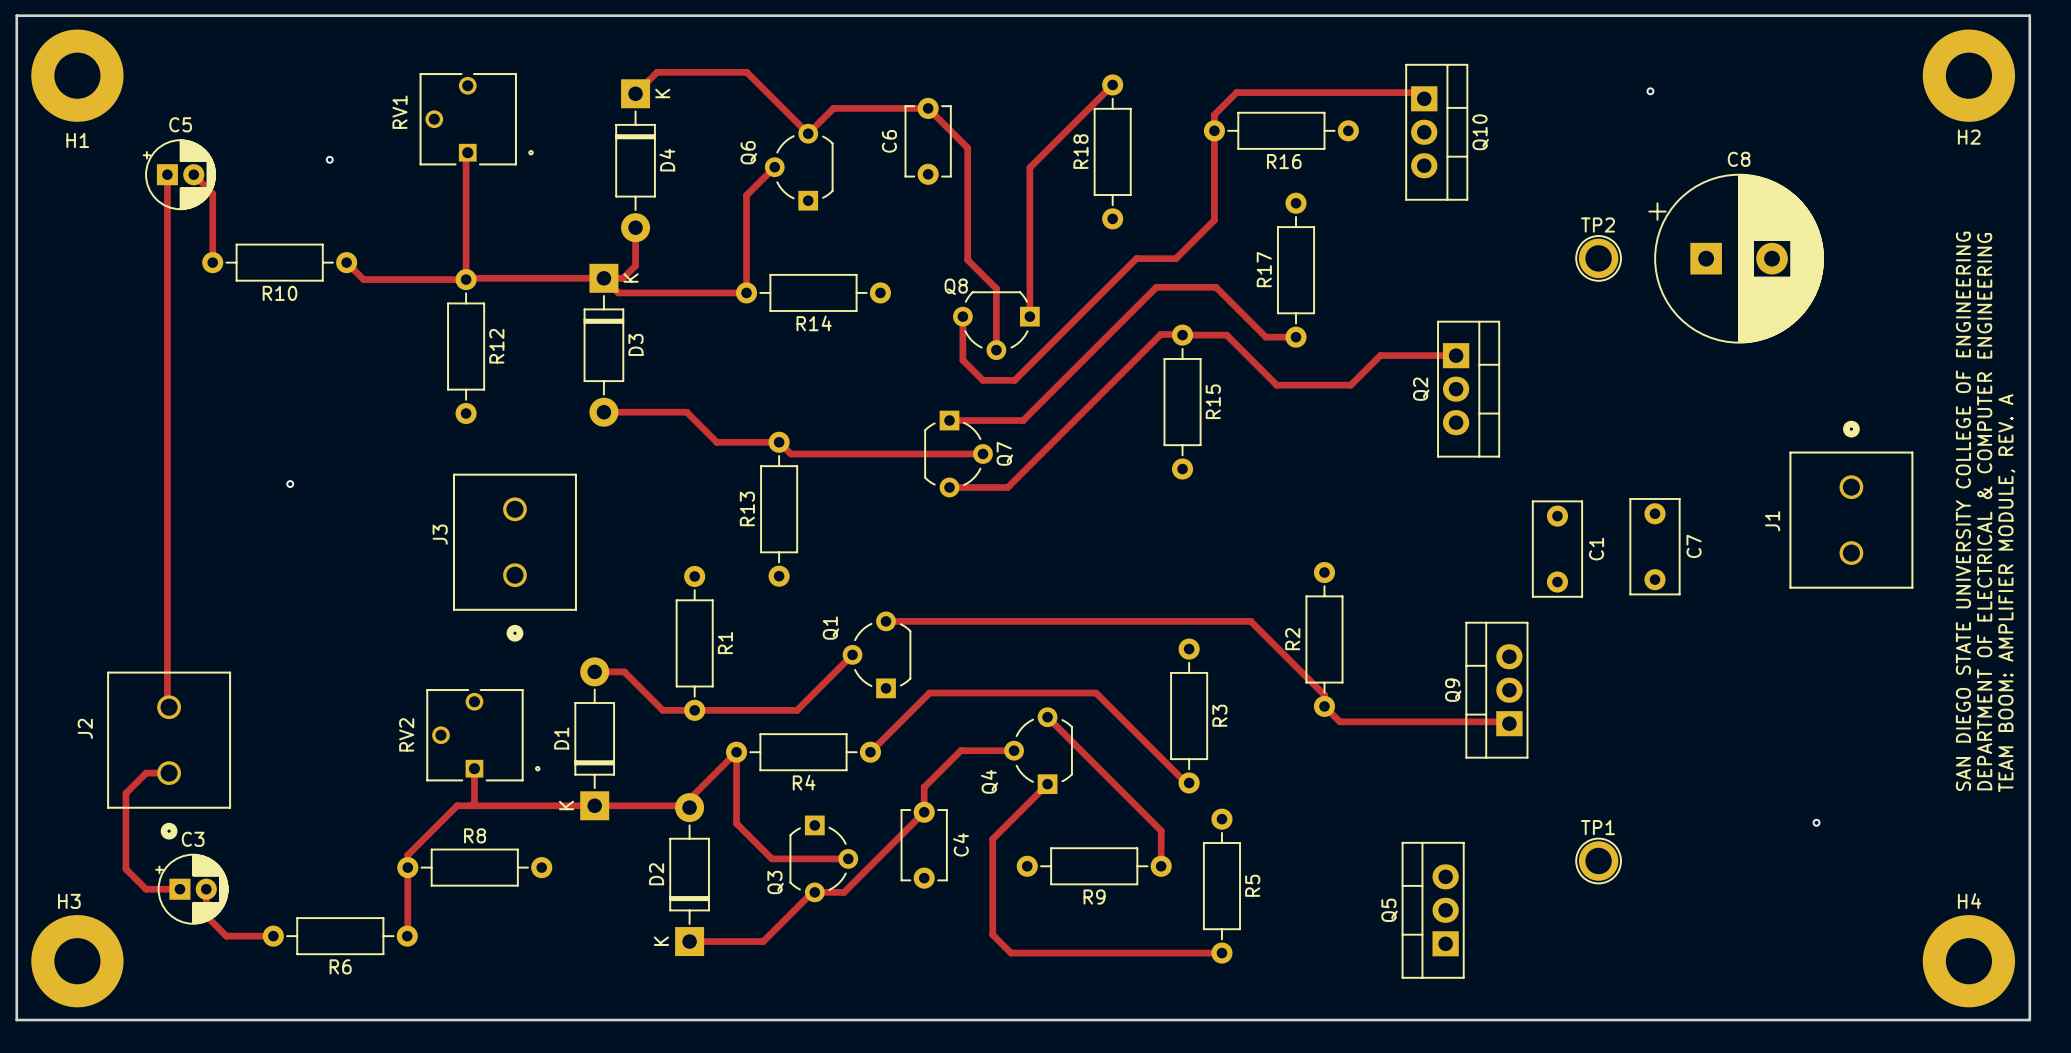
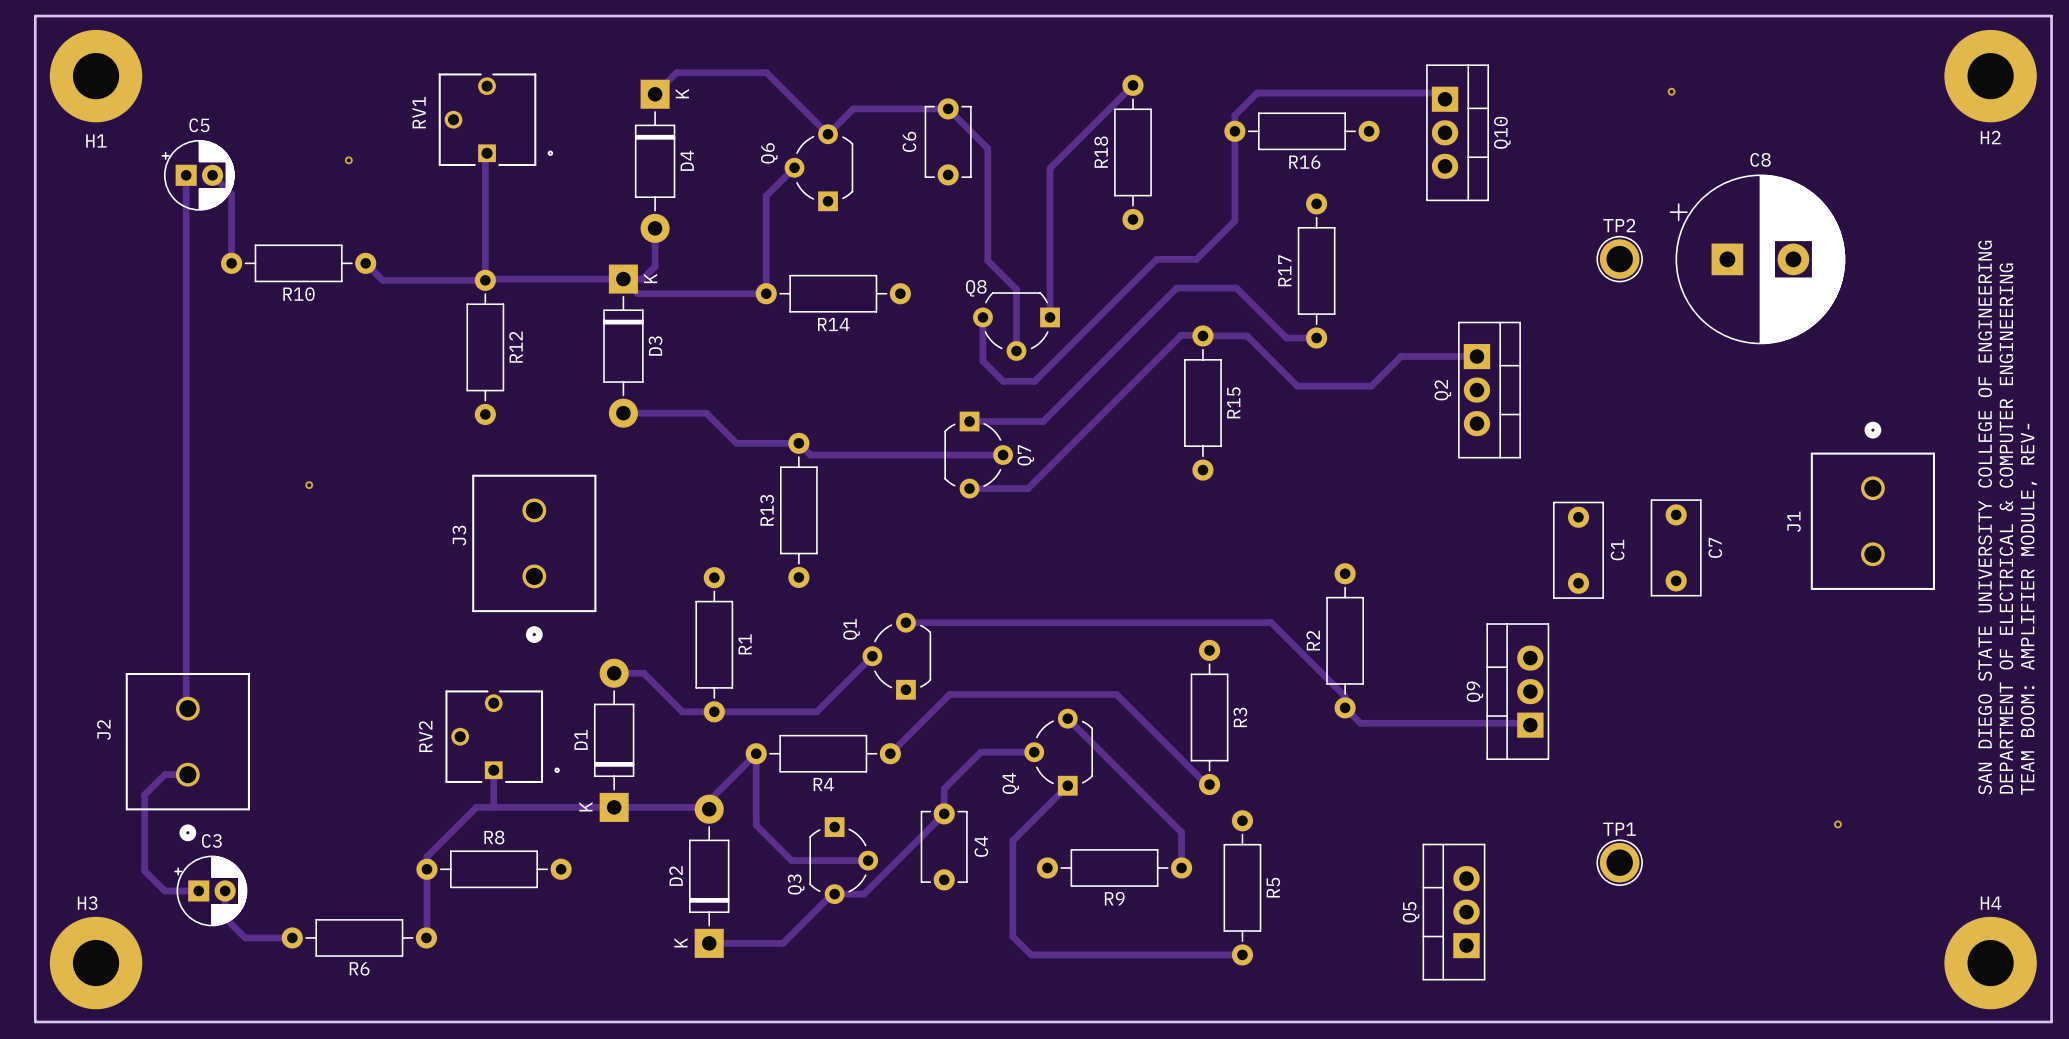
text: TEAM BOOM: AMPLIFIER MODULE, REV. A (2006, 593) -> TEAM BOOM: AMPLIFIER MODULE, REV- (2028, 609)

